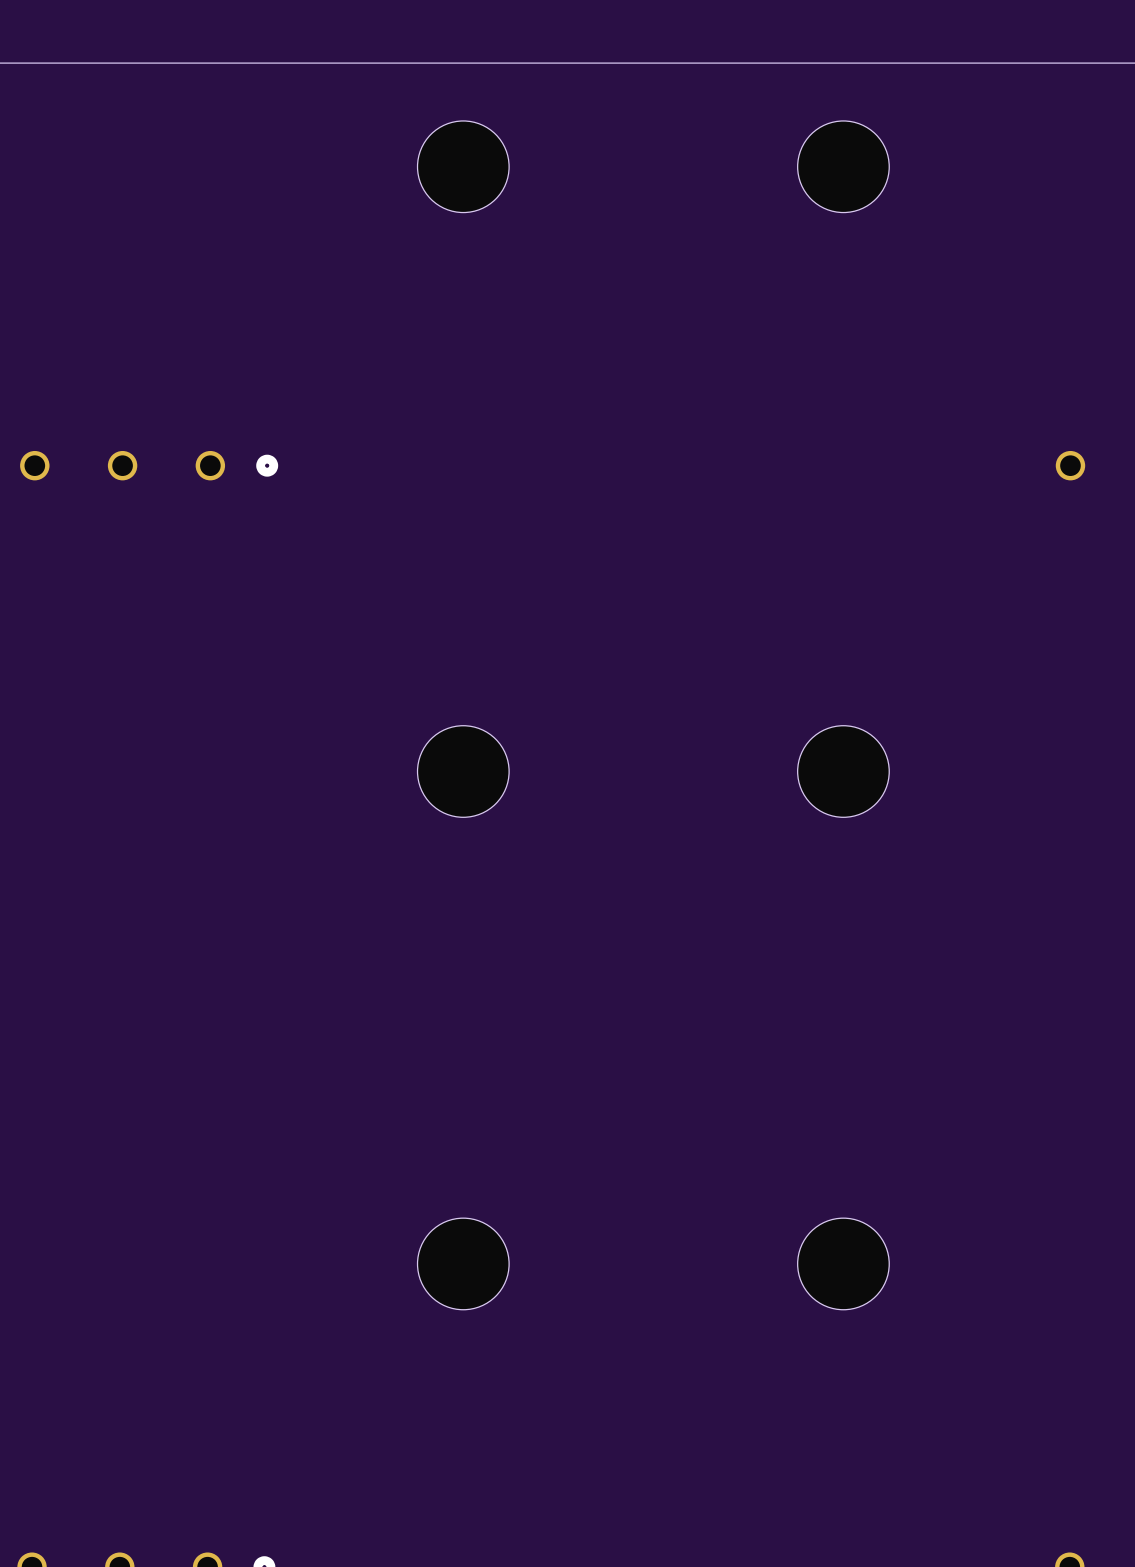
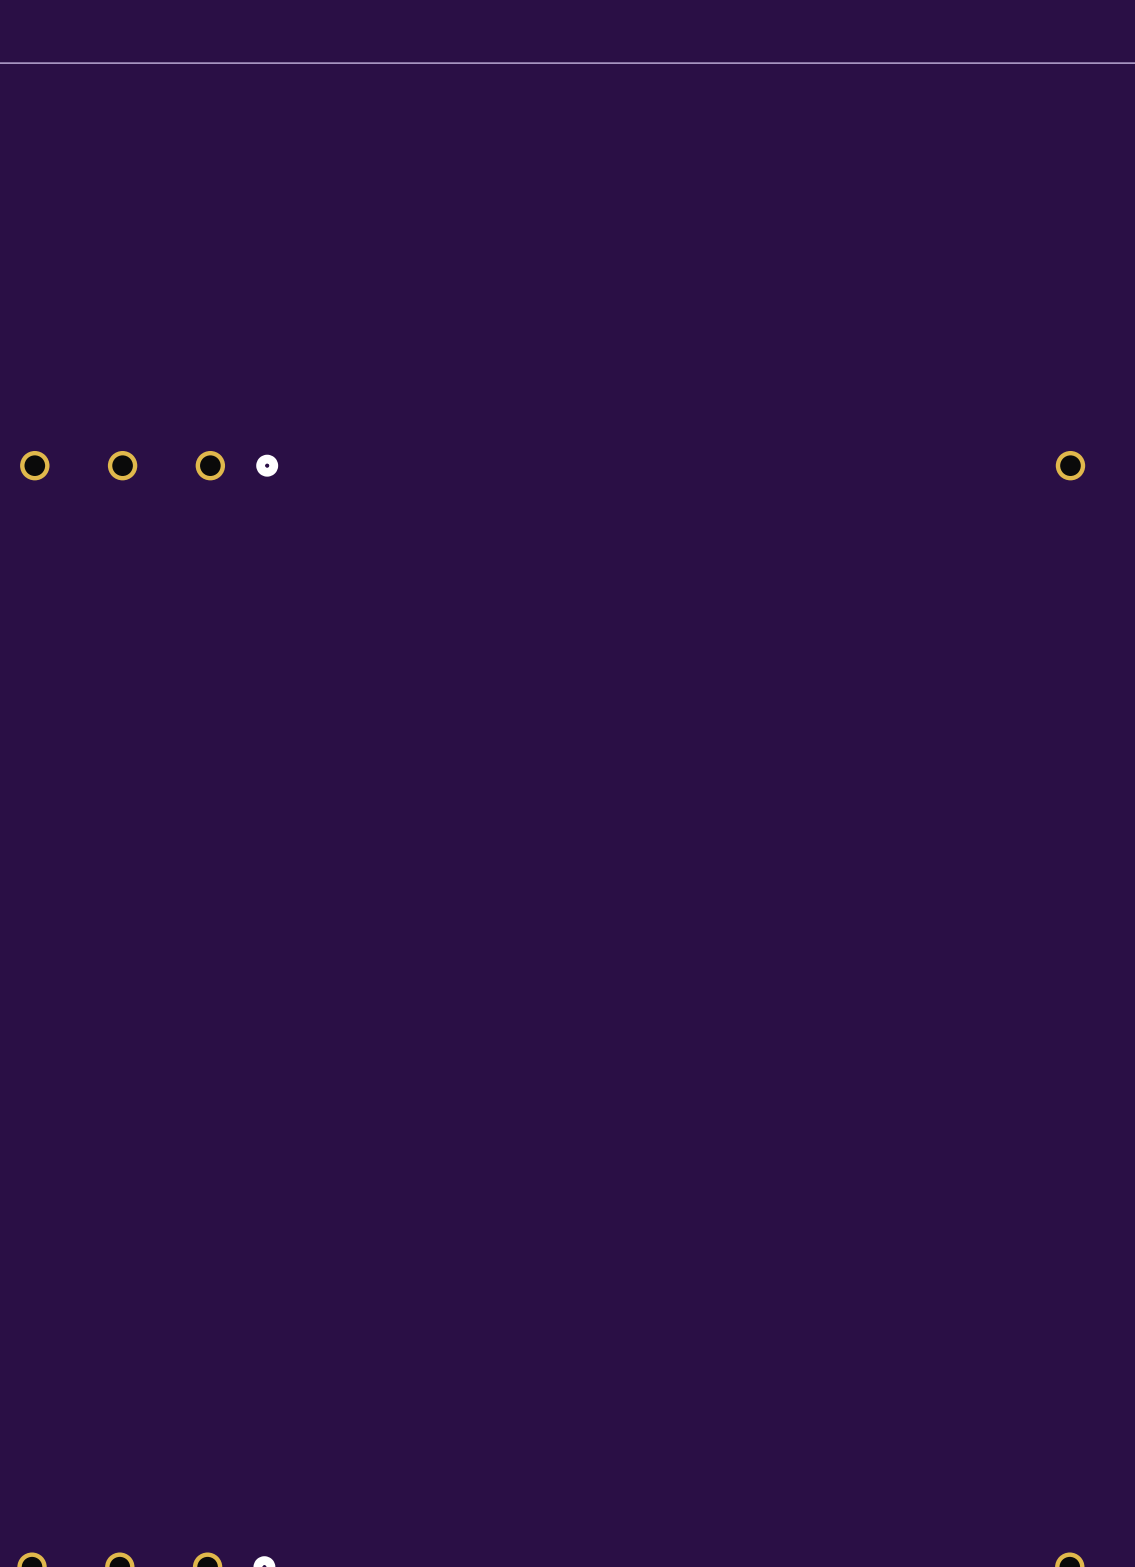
part: (463, 166) -> none
part: (843, 166) -> none
part: (463, 771) -> none
part: (843, 771) -> none
part: (463, 1263) -> none
part: (843, 1263) -> none

